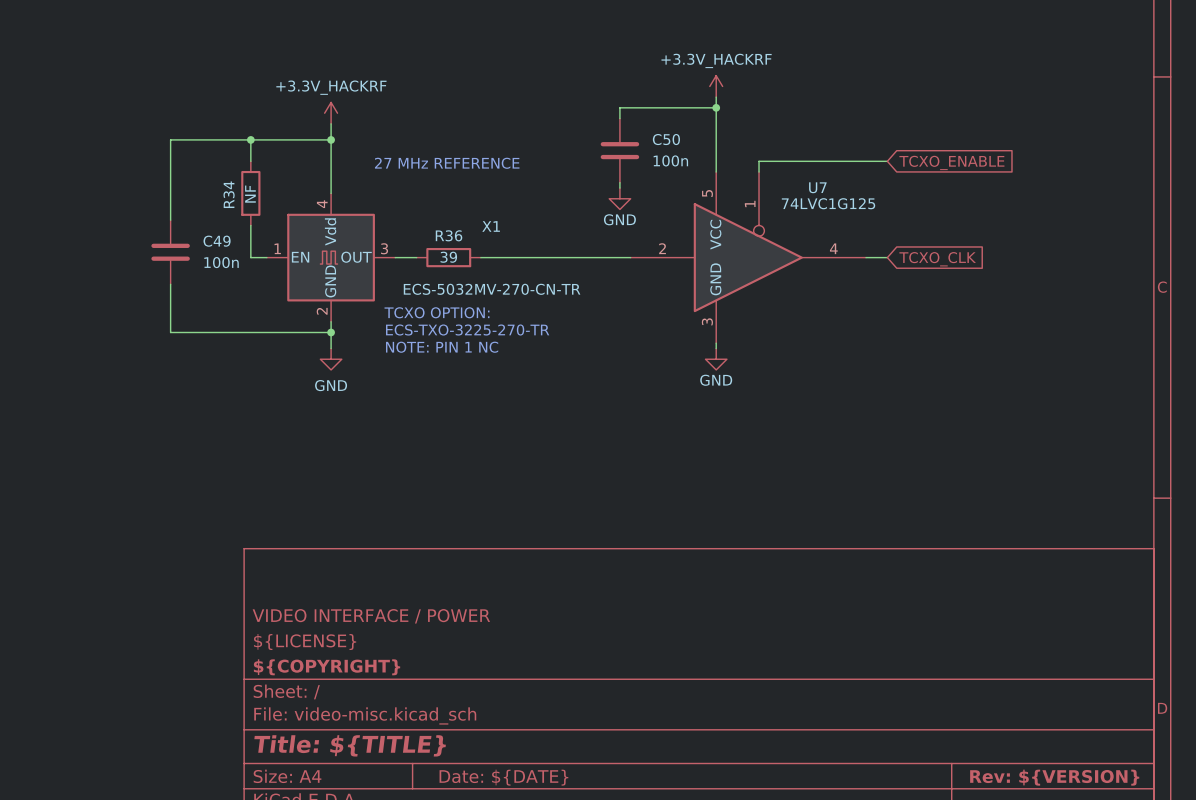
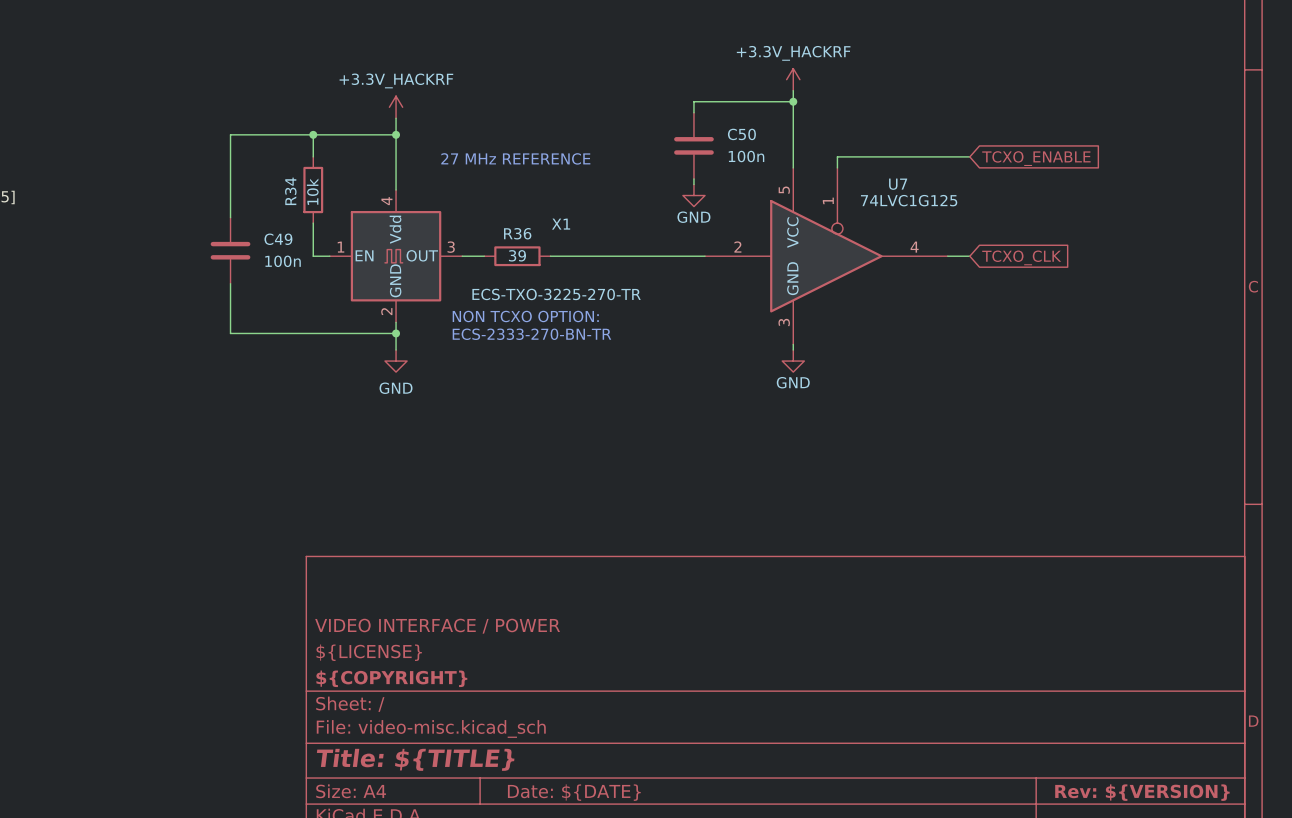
R34 value: NF (250, 194) -> 10k (312, 191)
X1 value: ECS-5032MV-270-CN-TR (492, 289) -> ECS-TXO-3225-270-TR (556, 294)
text: TCXO OPTION: (437, 312) -> NON TCXO OPTION: (525, 316)
text: ECS-TXO-3225-270-TR (467, 330) -> ECS-2333-270-BN-TR (531, 334)
text: NOTE: PIN 1 NC (442, 347) -> none

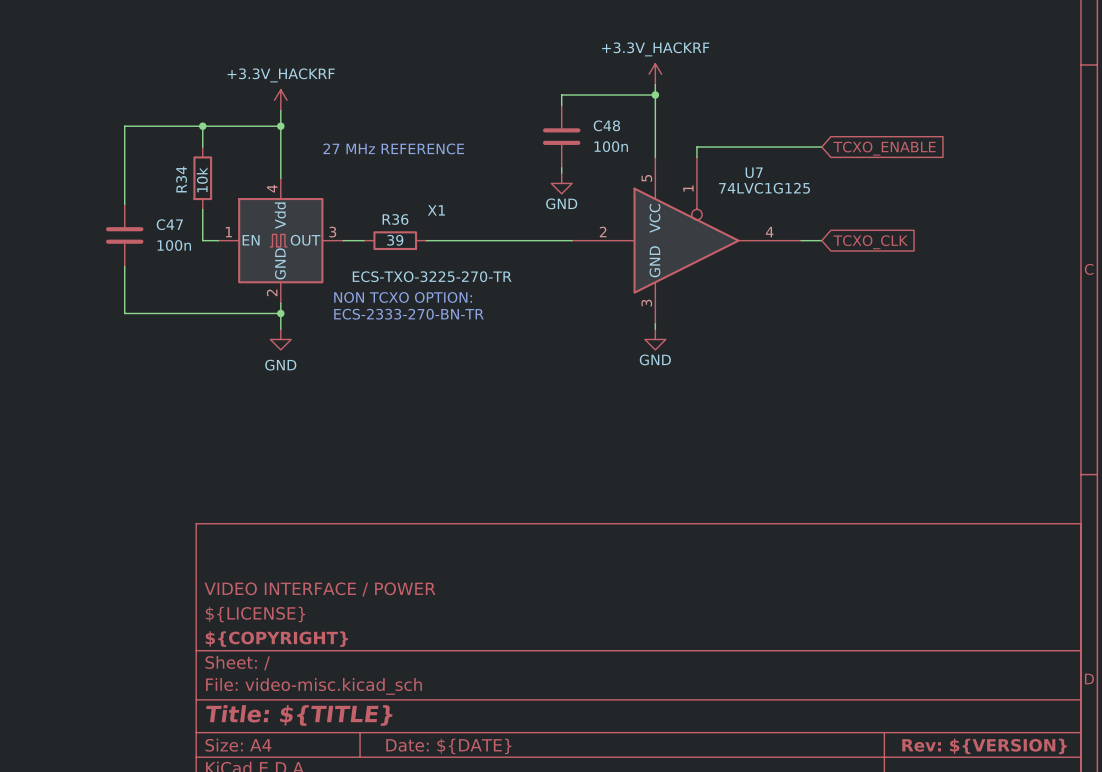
C50 name: C50 (741, 134) -> C48 (606, 125)
C49 name: C49 (278, 239) -> C47 (169, 224)

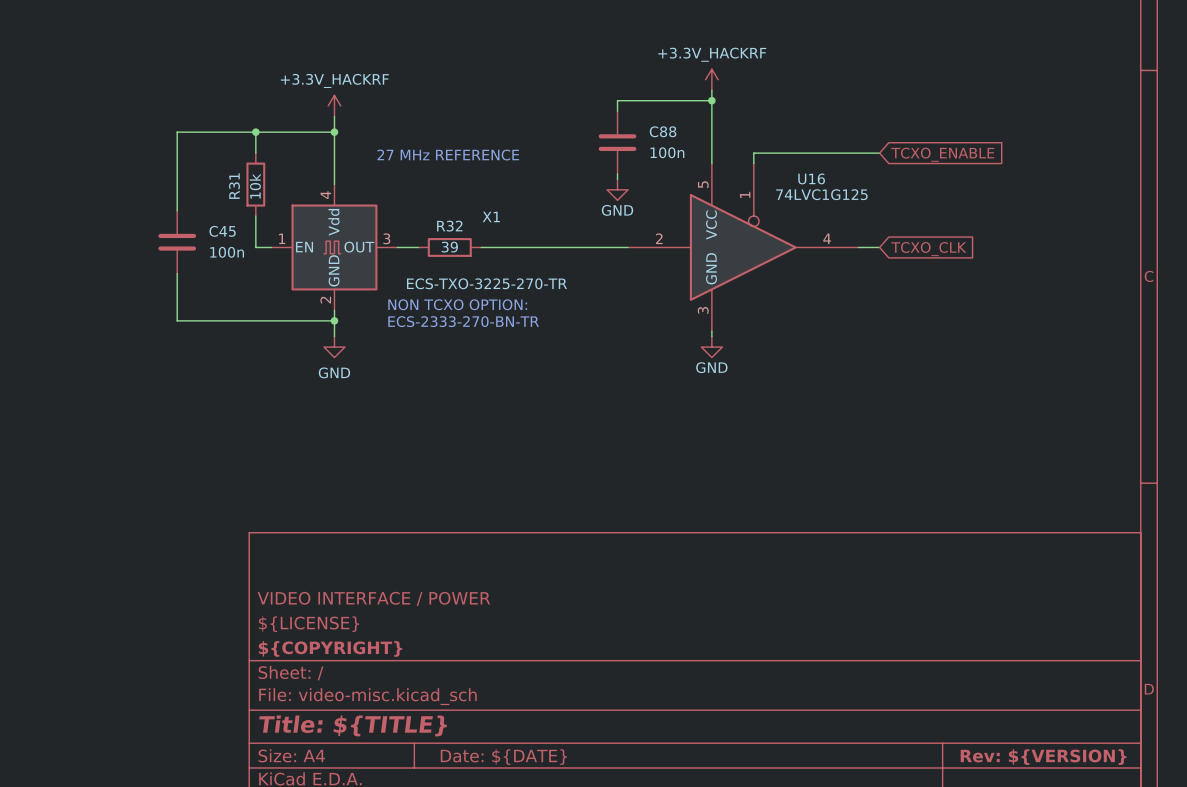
C48 name: C48 (606, 125) -> C88 (663, 131)
U7 name: U7 (754, 172) -> U16 (811, 178)
R34 name: R34 (181, 179) -> R31 (234, 186)
R36 name: R36 (395, 219) -> R32 (449, 226)
C47 name: C47 (169, 224) -> C45 (222, 231)

